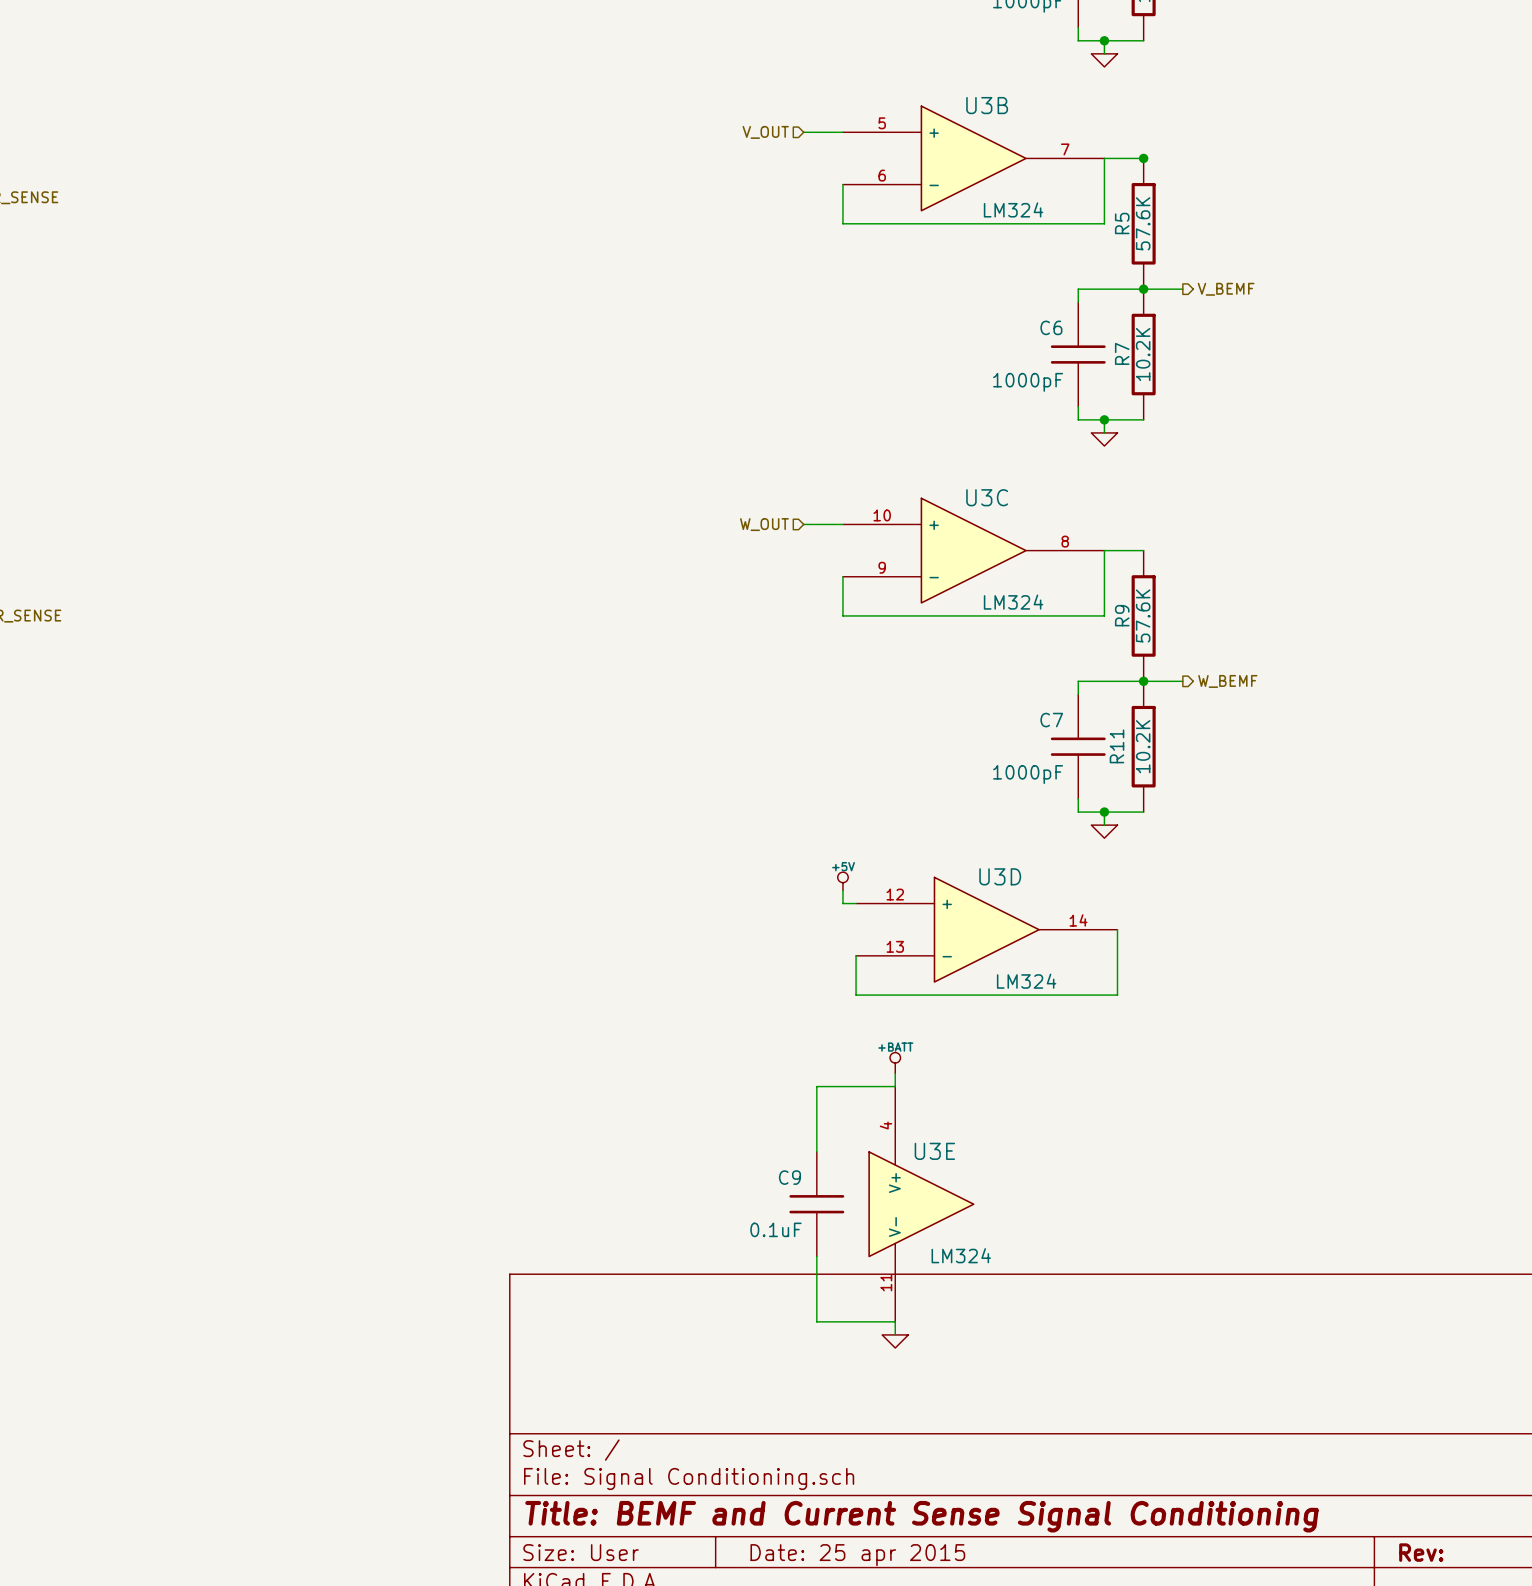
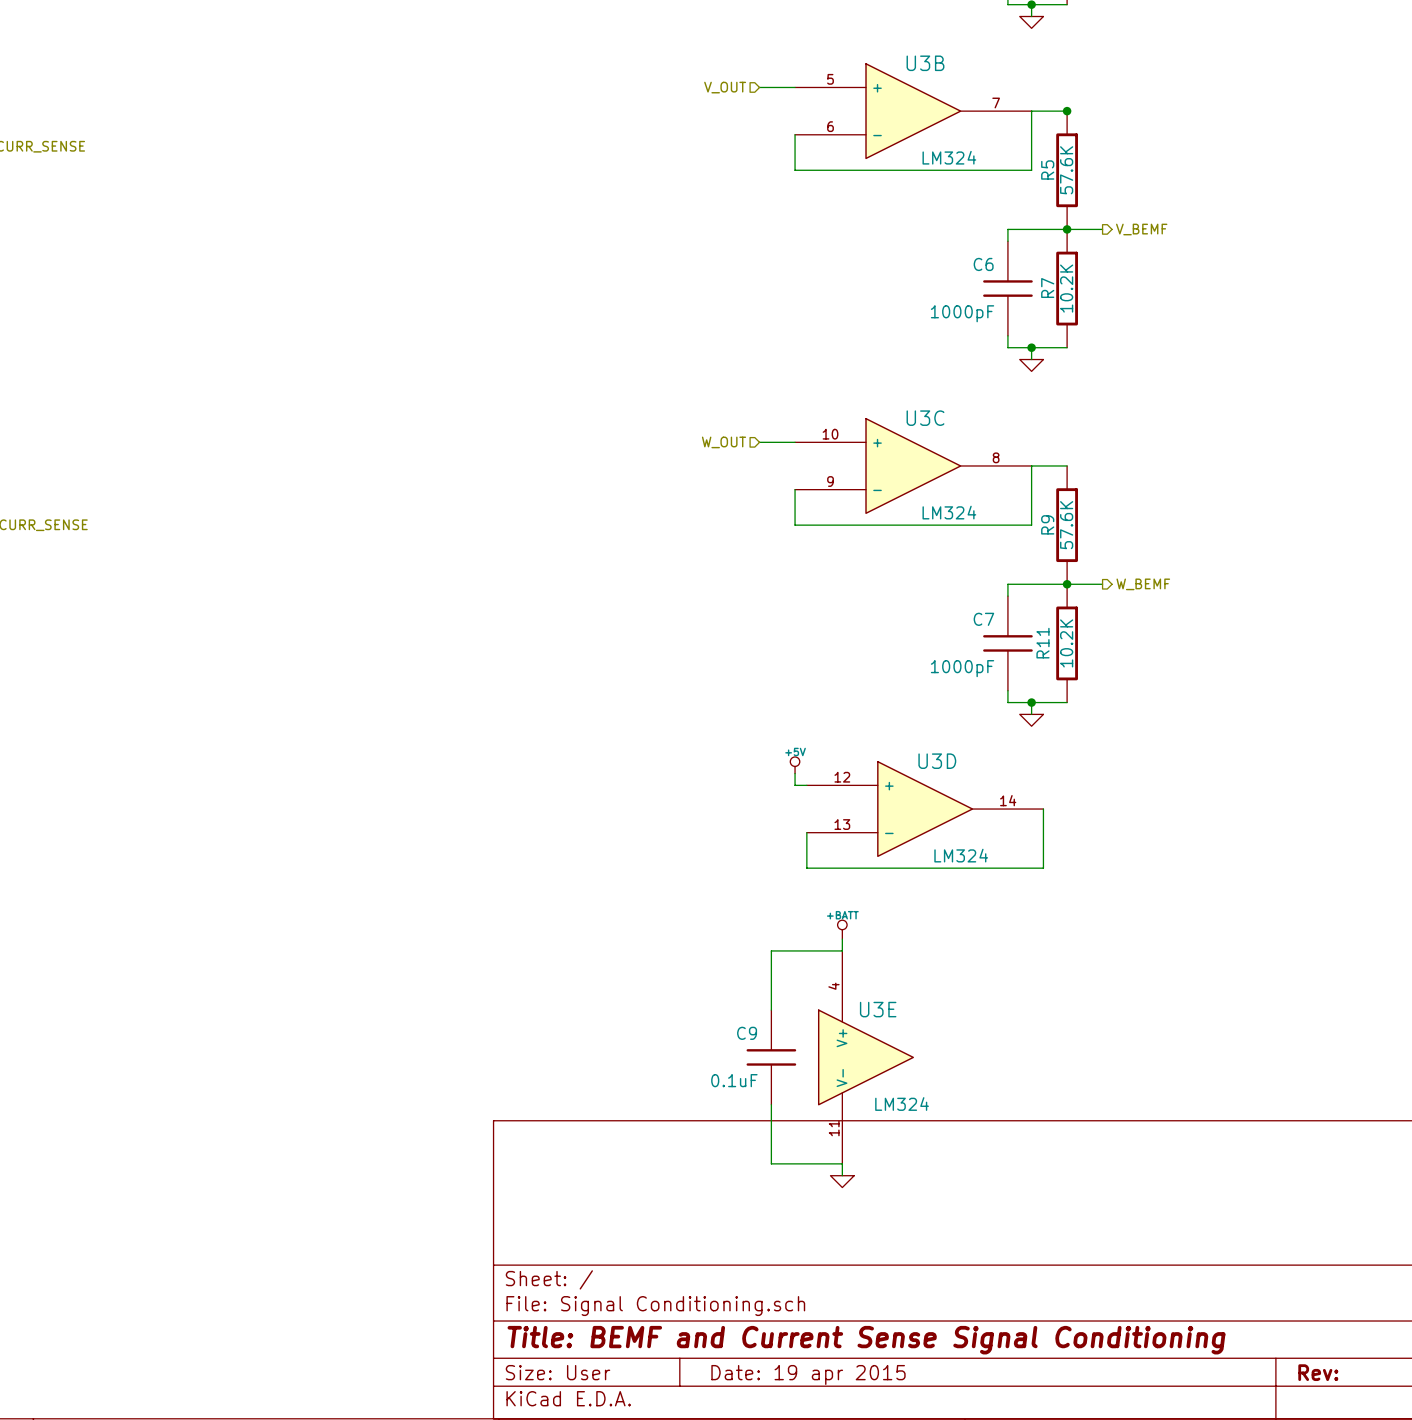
title block: Date: 25 apr 2015 (857, 1555) -> Date: 19 apr 2015 (808, 1374)

